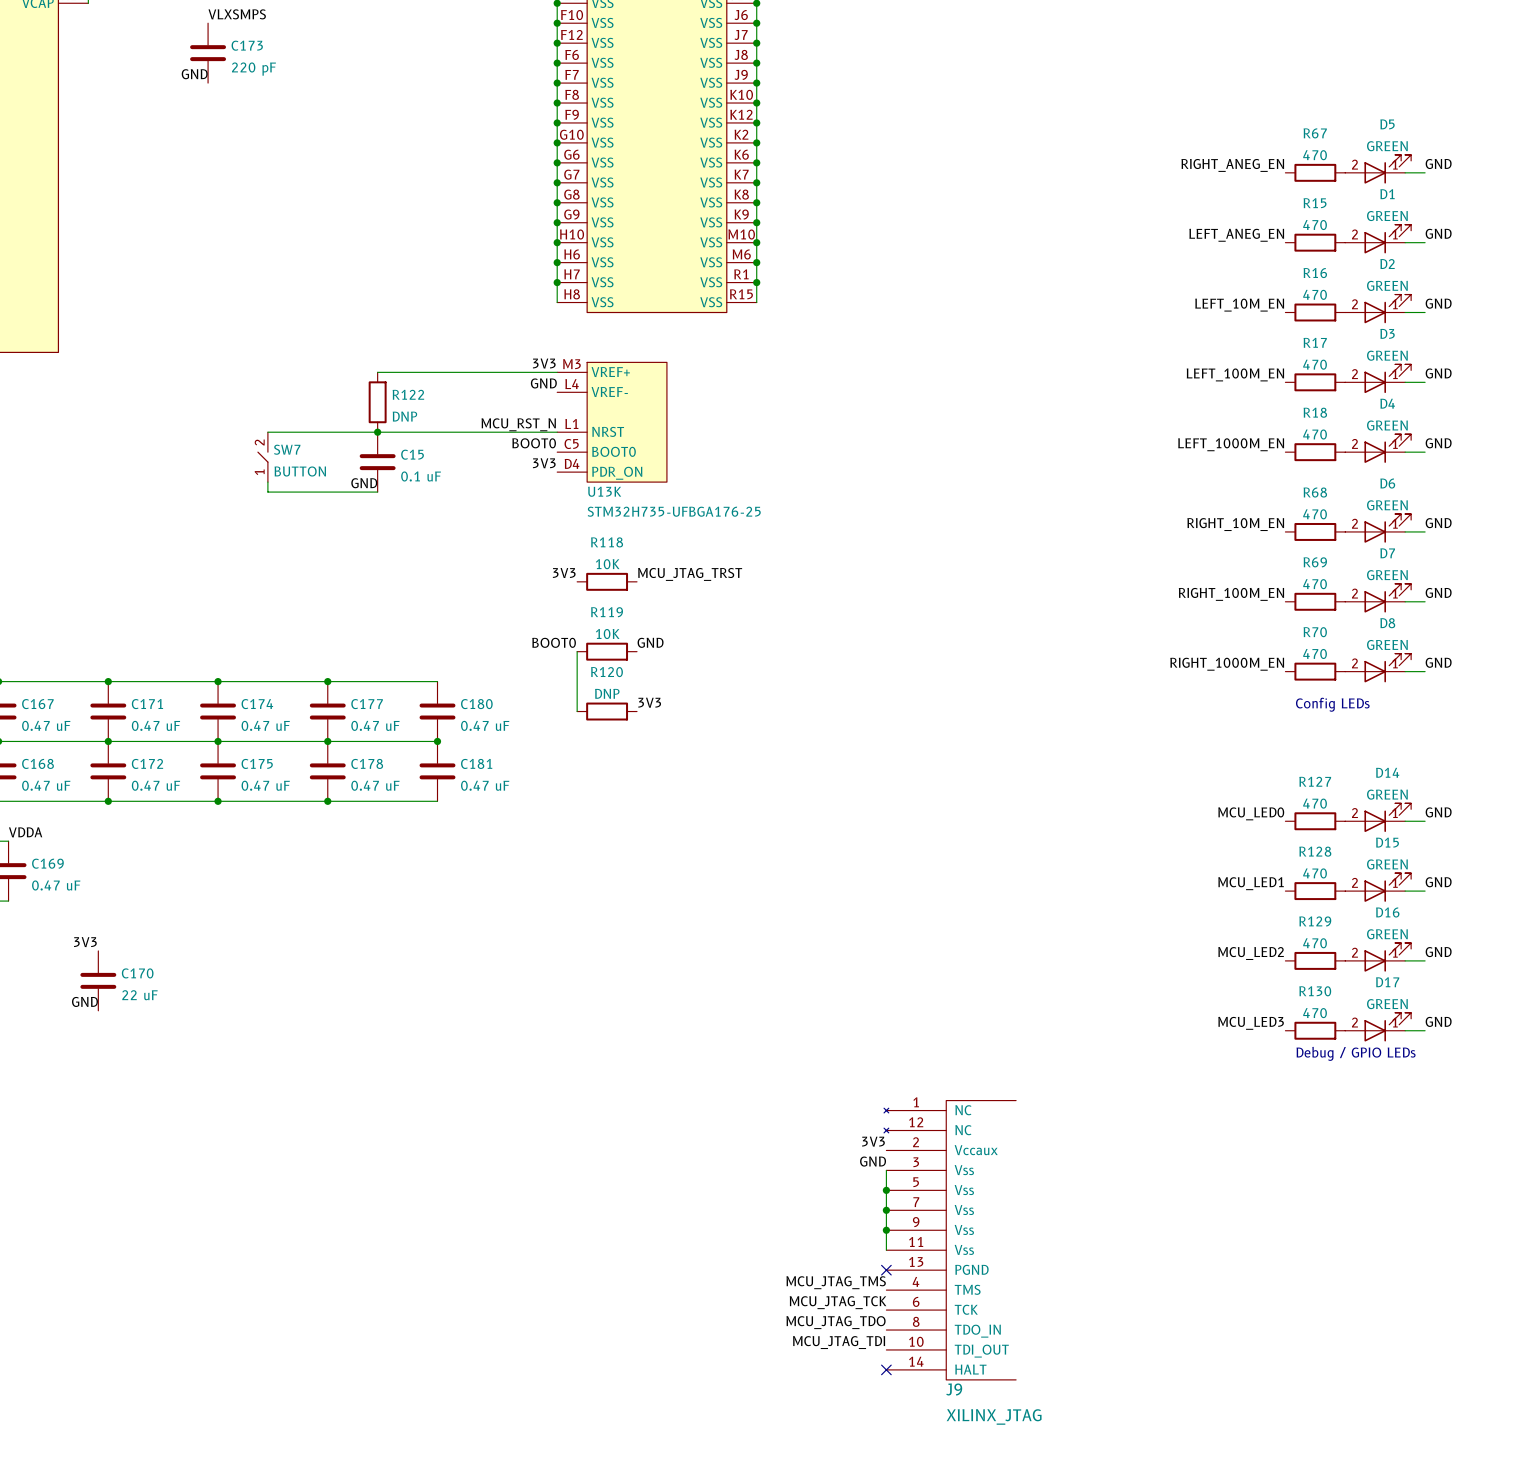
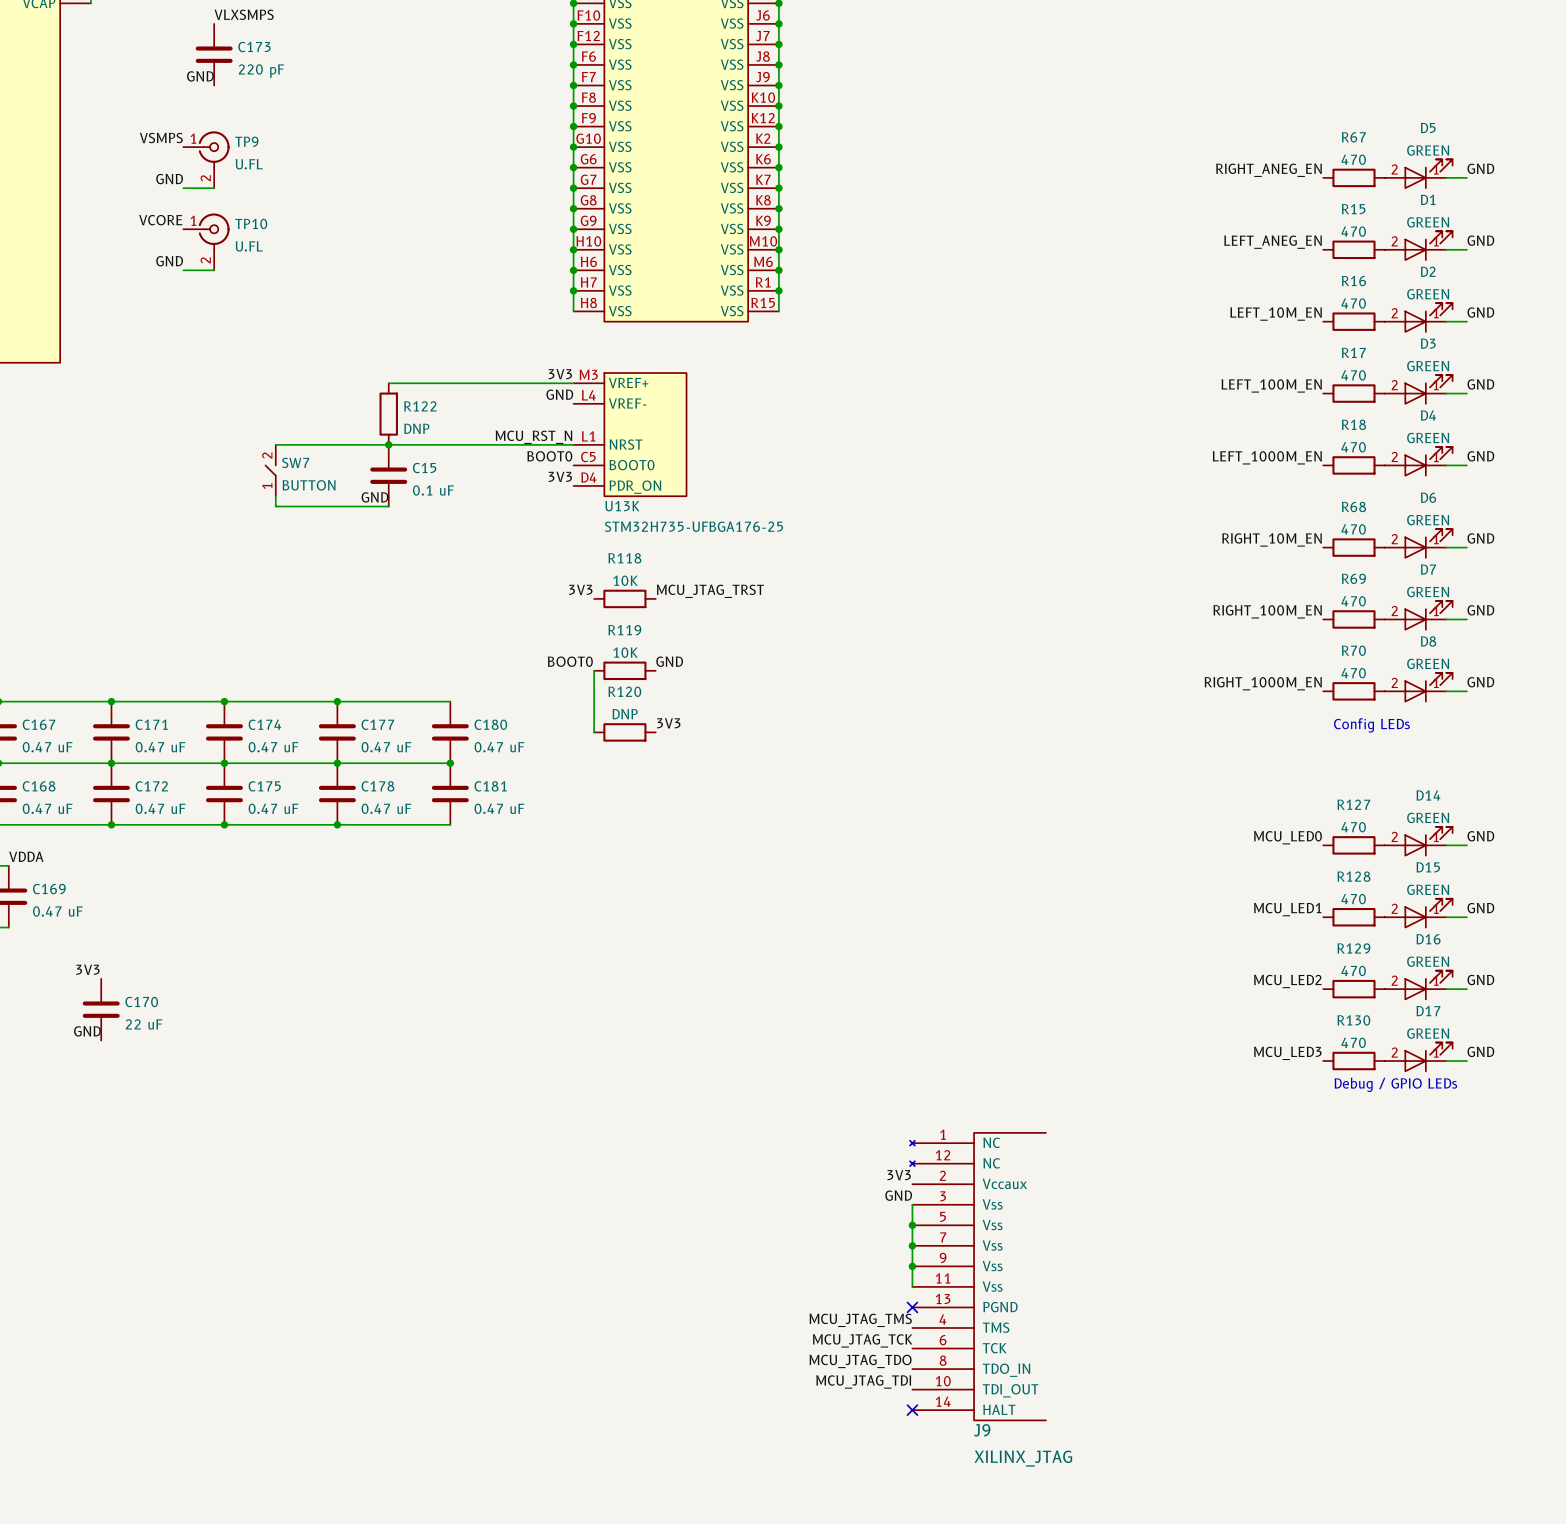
label: none -> VSMPS (161, 138)
TP9: none -> U.FL (206, 159)
label: none -> GND (169, 179)
wire: none -> (183, 188) (214, 188)
label: none -> VCORE (160, 220)
TP10: none -> U.FL (206, 241)
label: none -> GND (169, 261)
wire: none -> (183, 270) (214, 270)

